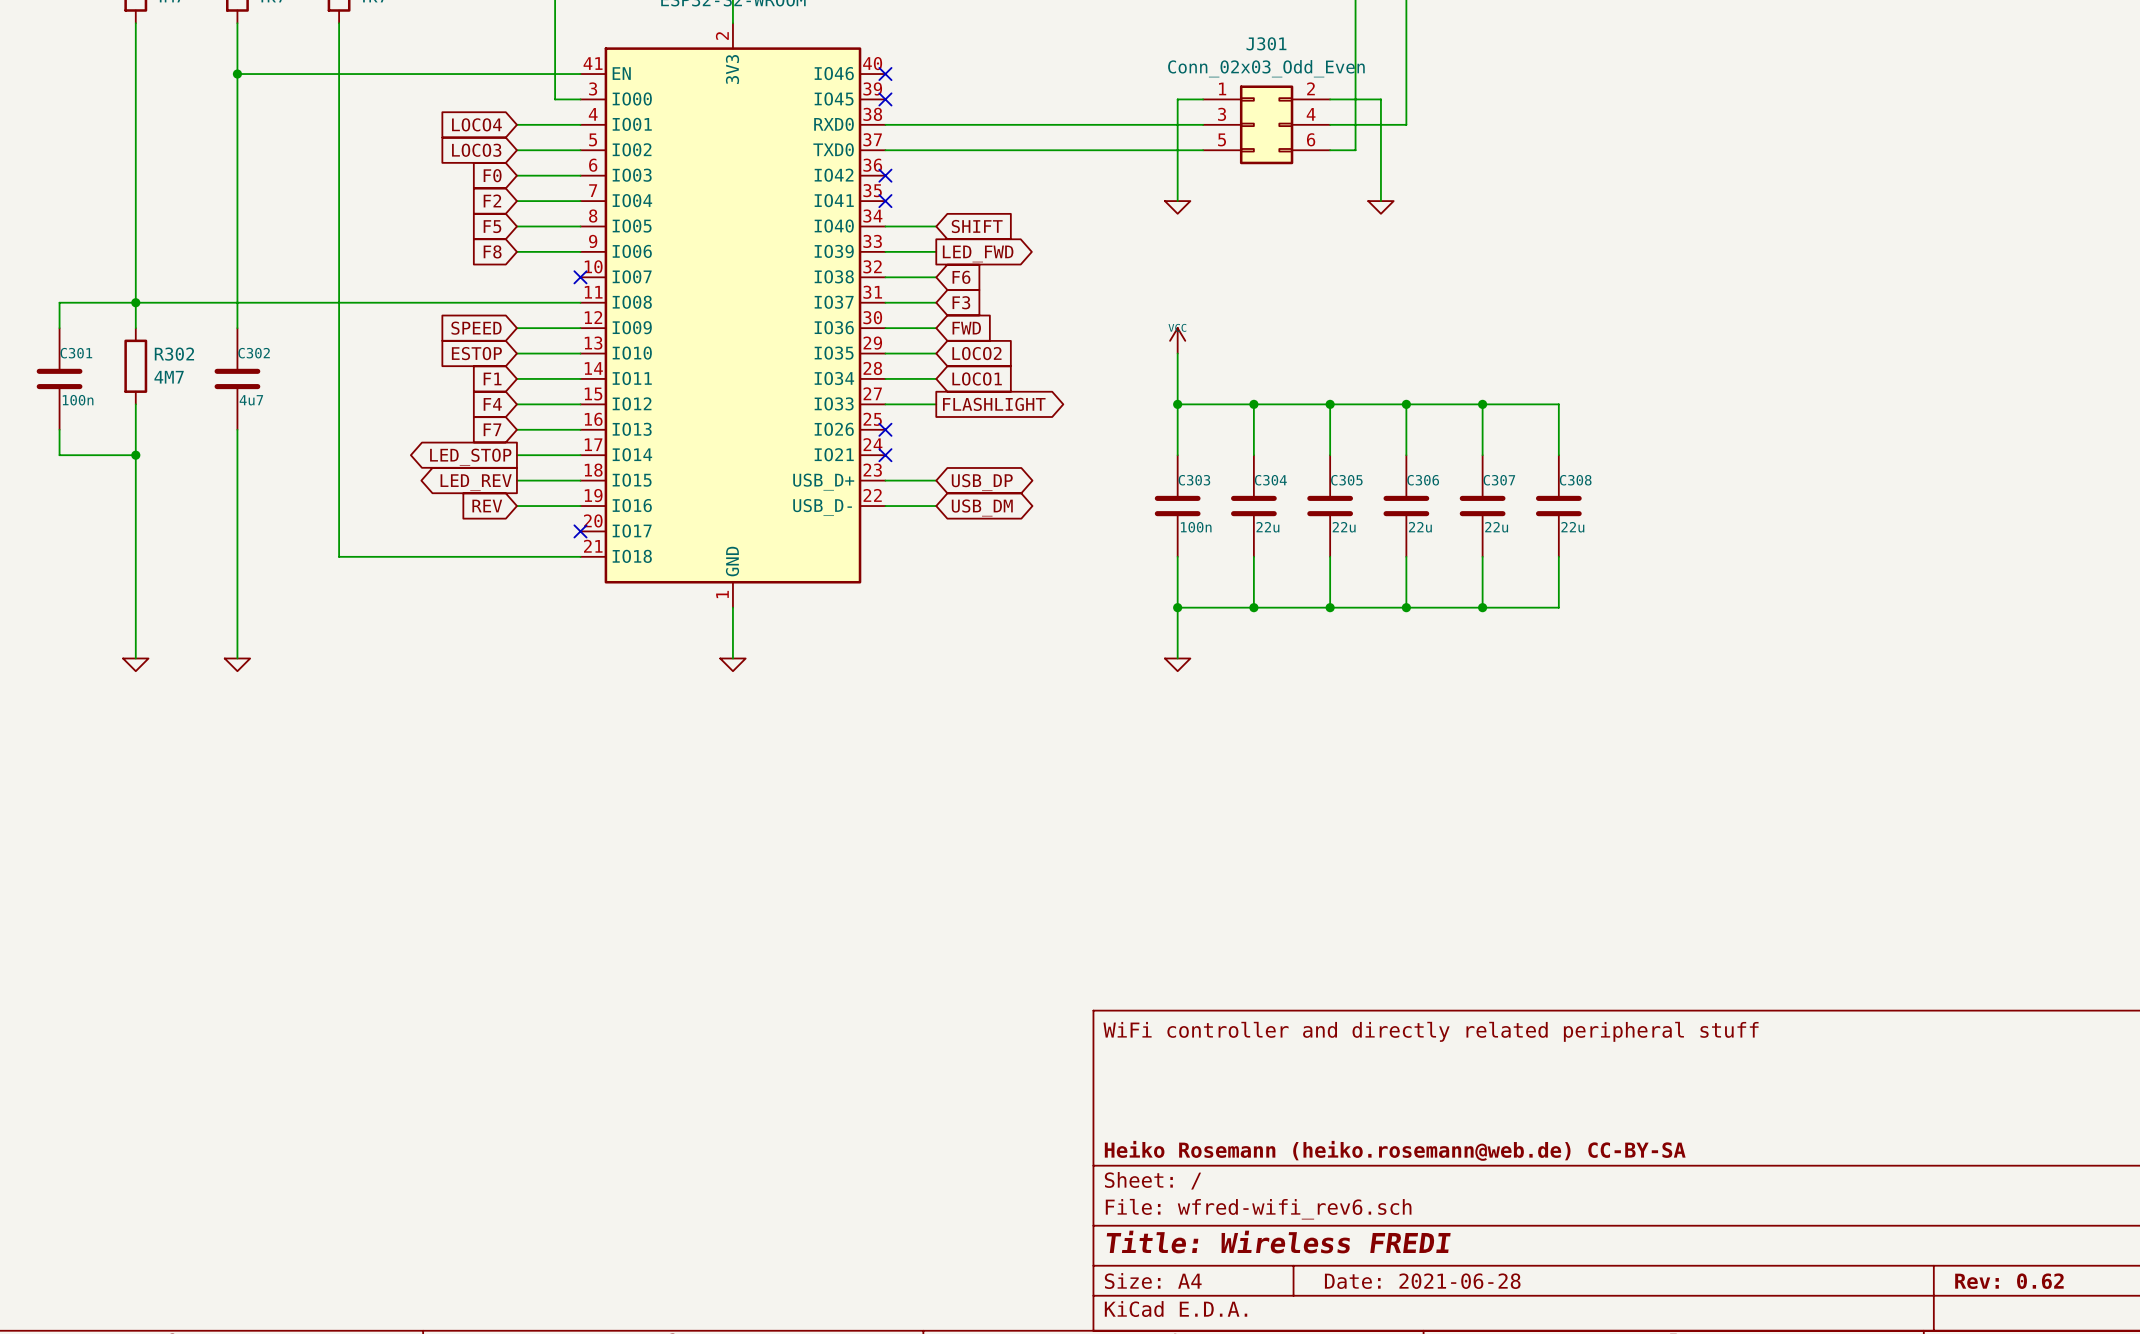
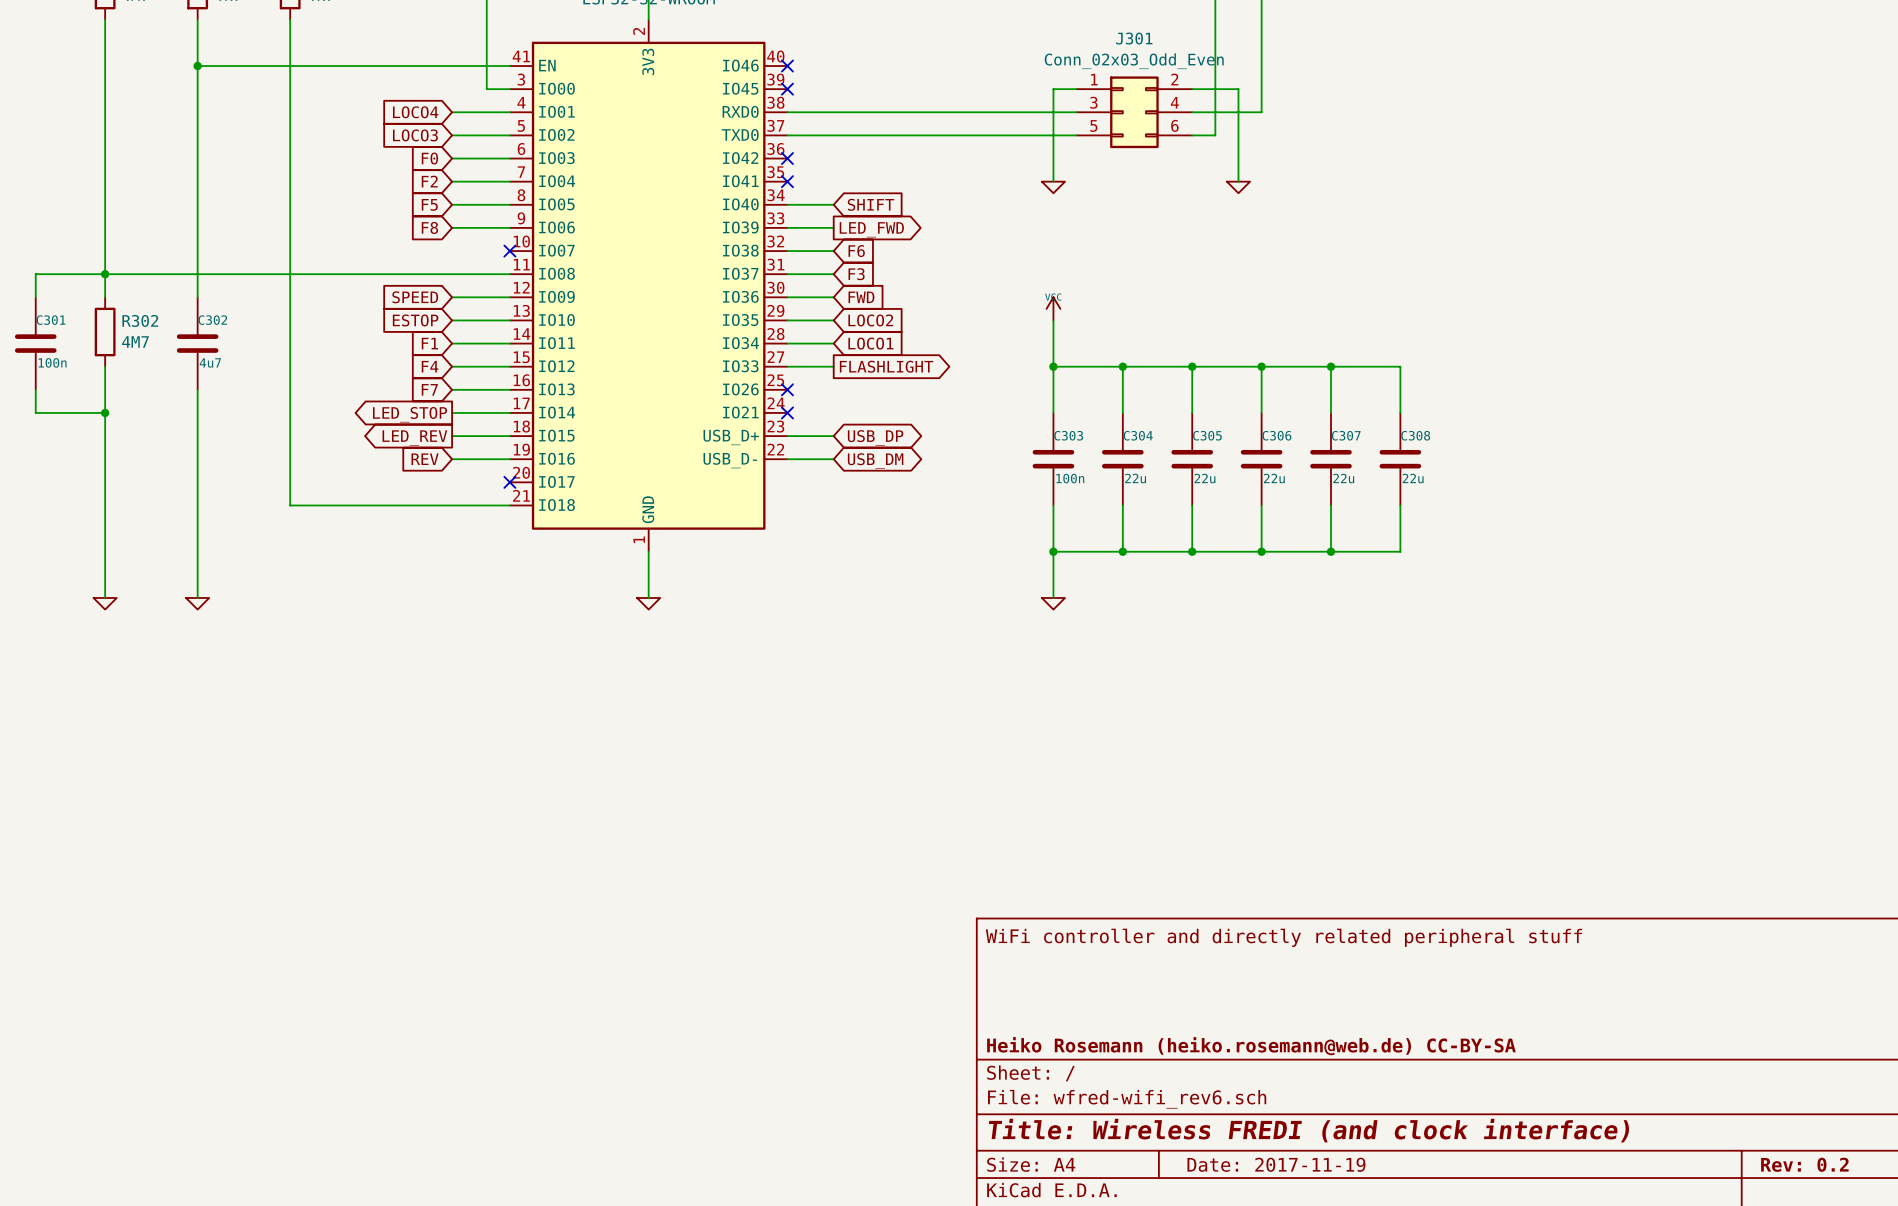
title block: Title: Wireless FREDI (1278, 1242) -> Title: Wireless FREDI (and clock interface) (1309, 1130)
title block: Date: 2021-06-28 (1422, 1281) -> Date: 2017-11-19 (1276, 1164)
title block: Rev: 0.62 (2009, 1281) -> Rev: 0.2 (1804, 1164)

